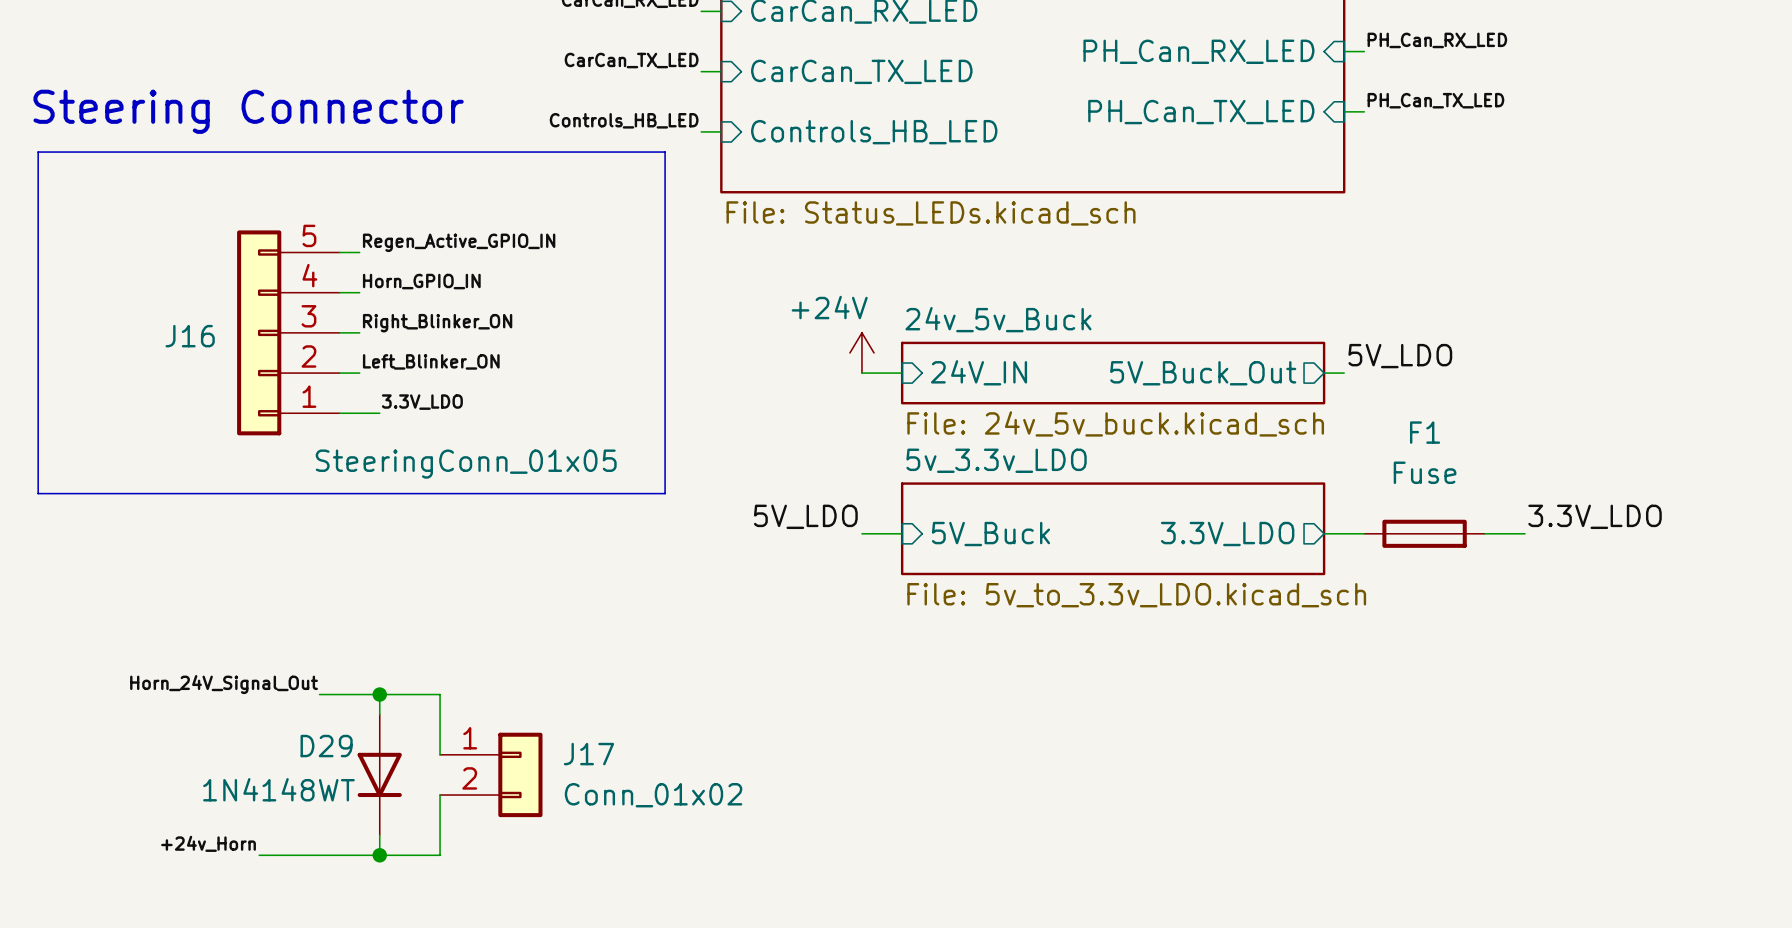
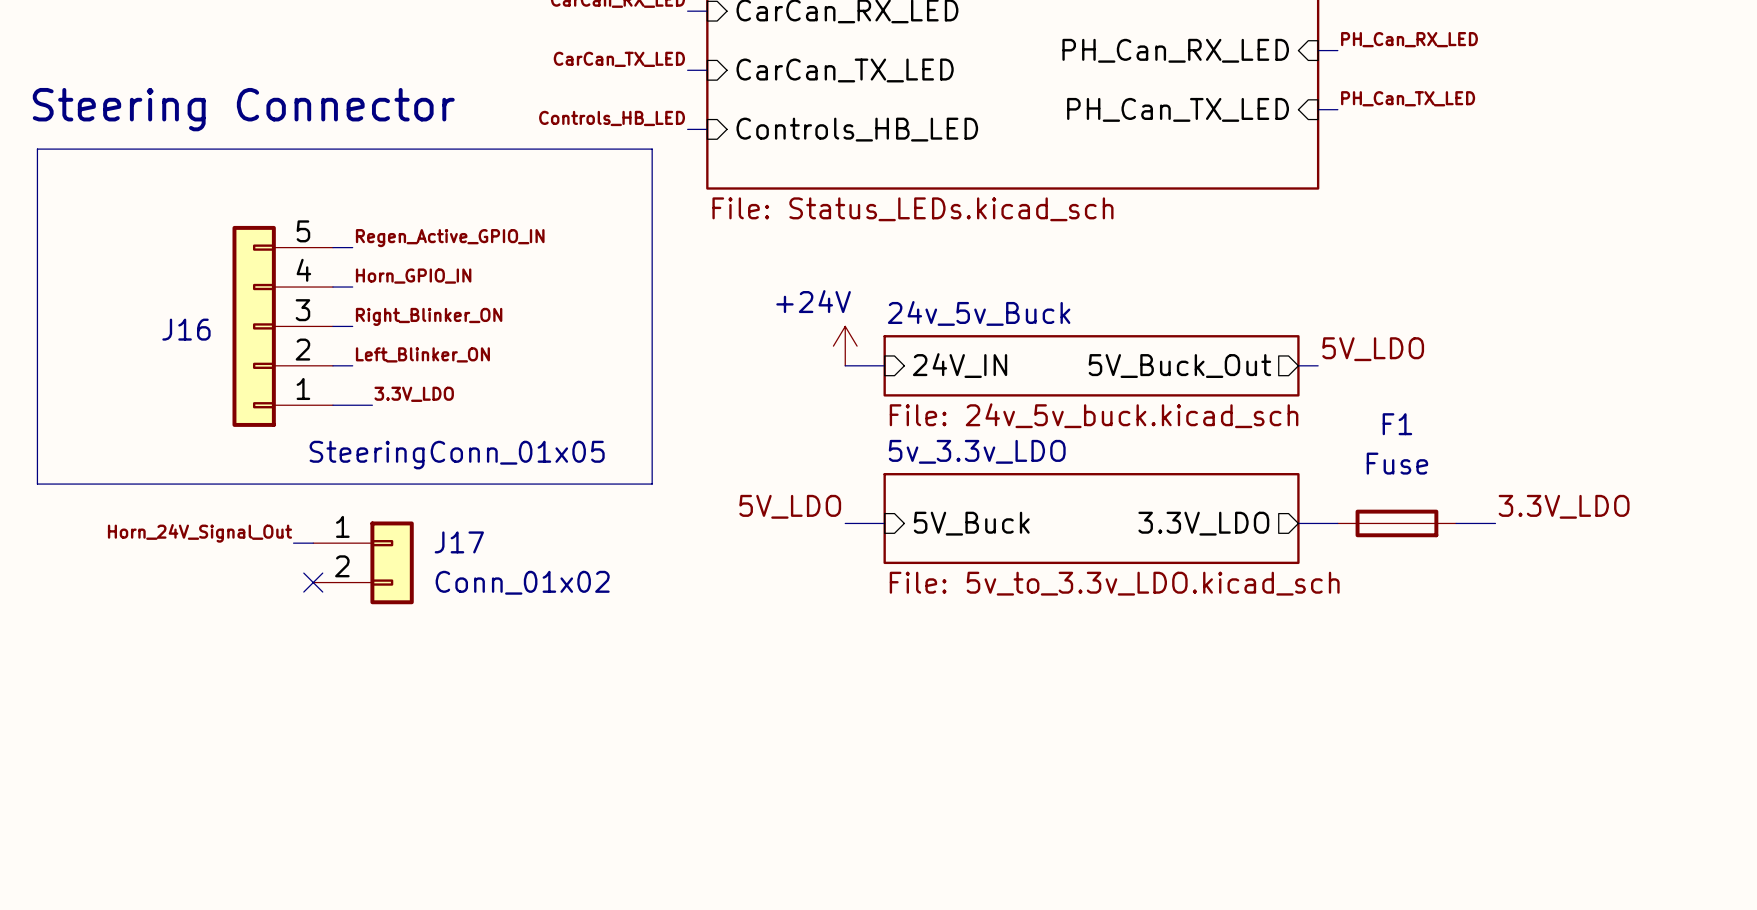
wire: none -> (293, 543) (313, 543)
no-connect mark: none -> (313, 582)
label position: Horn_24V_Signal_Out (224, 684) -> Horn_24V_Signal_Out (199, 533)
wire: (319, 694) (440, 694) (440, 754) -> none
wire: (379, 694) (379, 714) -> none
junction: (379, 694) -> none
D29: 1N4148WT (379, 774) -> none
J17 position: (491, 774) -> (363, 562)
wire: (440, 795) (440, 855) (259, 855) -> none
wire: (379, 835) (379, 855) -> none
label: +24v_Horn (208, 843) -> none
junction: (379, 855) -> none

